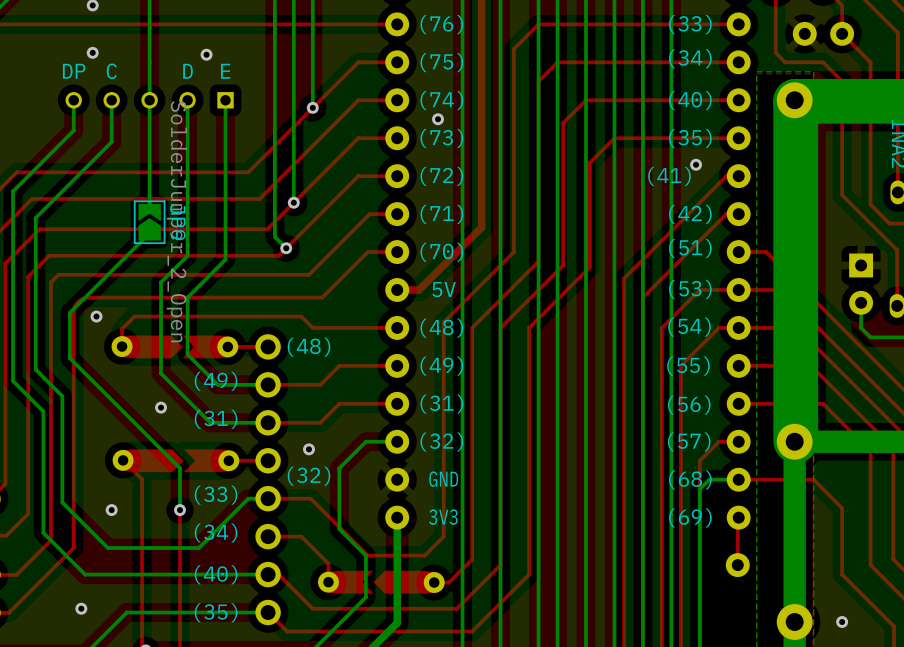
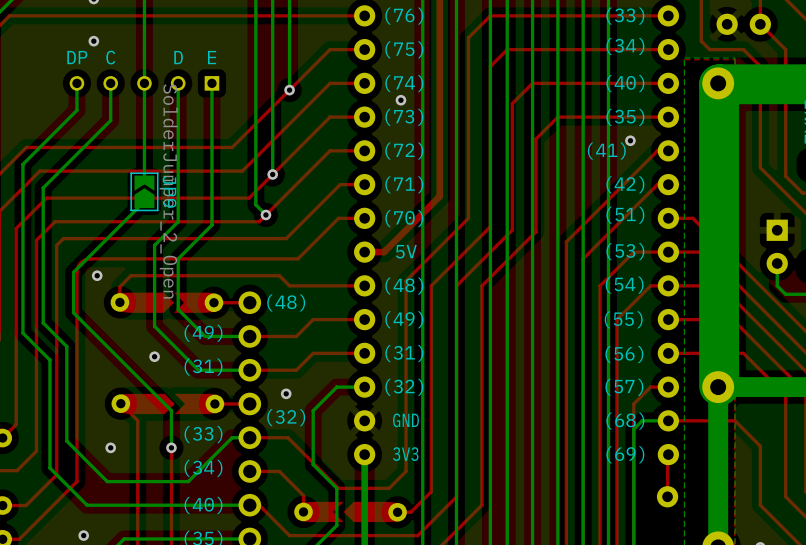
via: (206, 54) -> none

